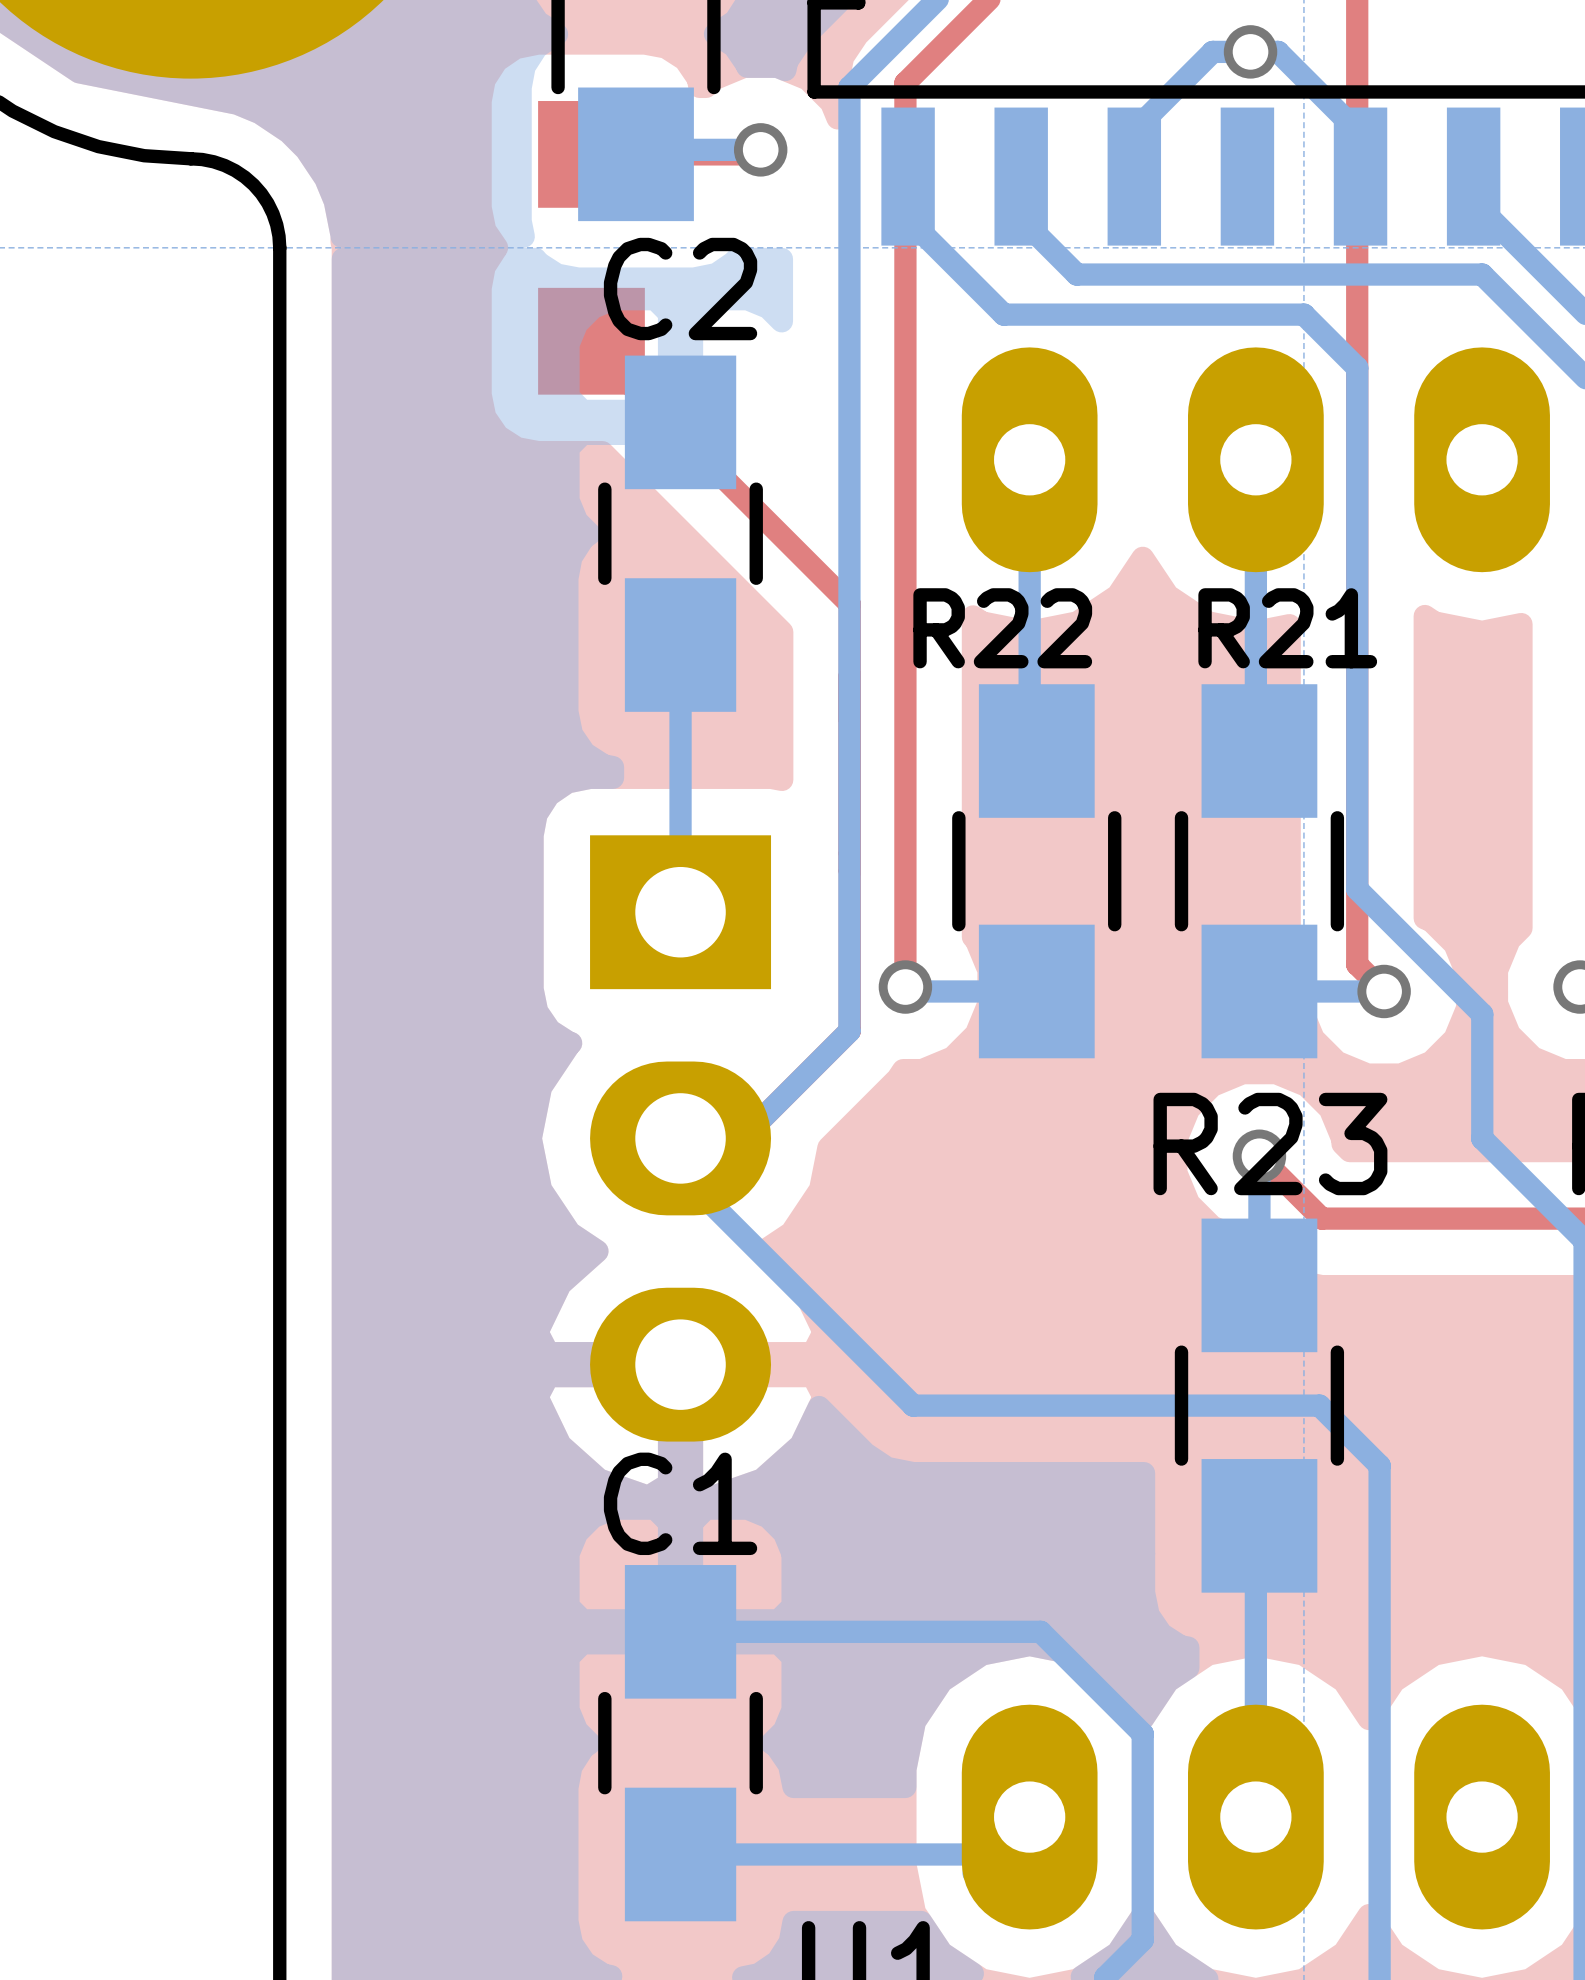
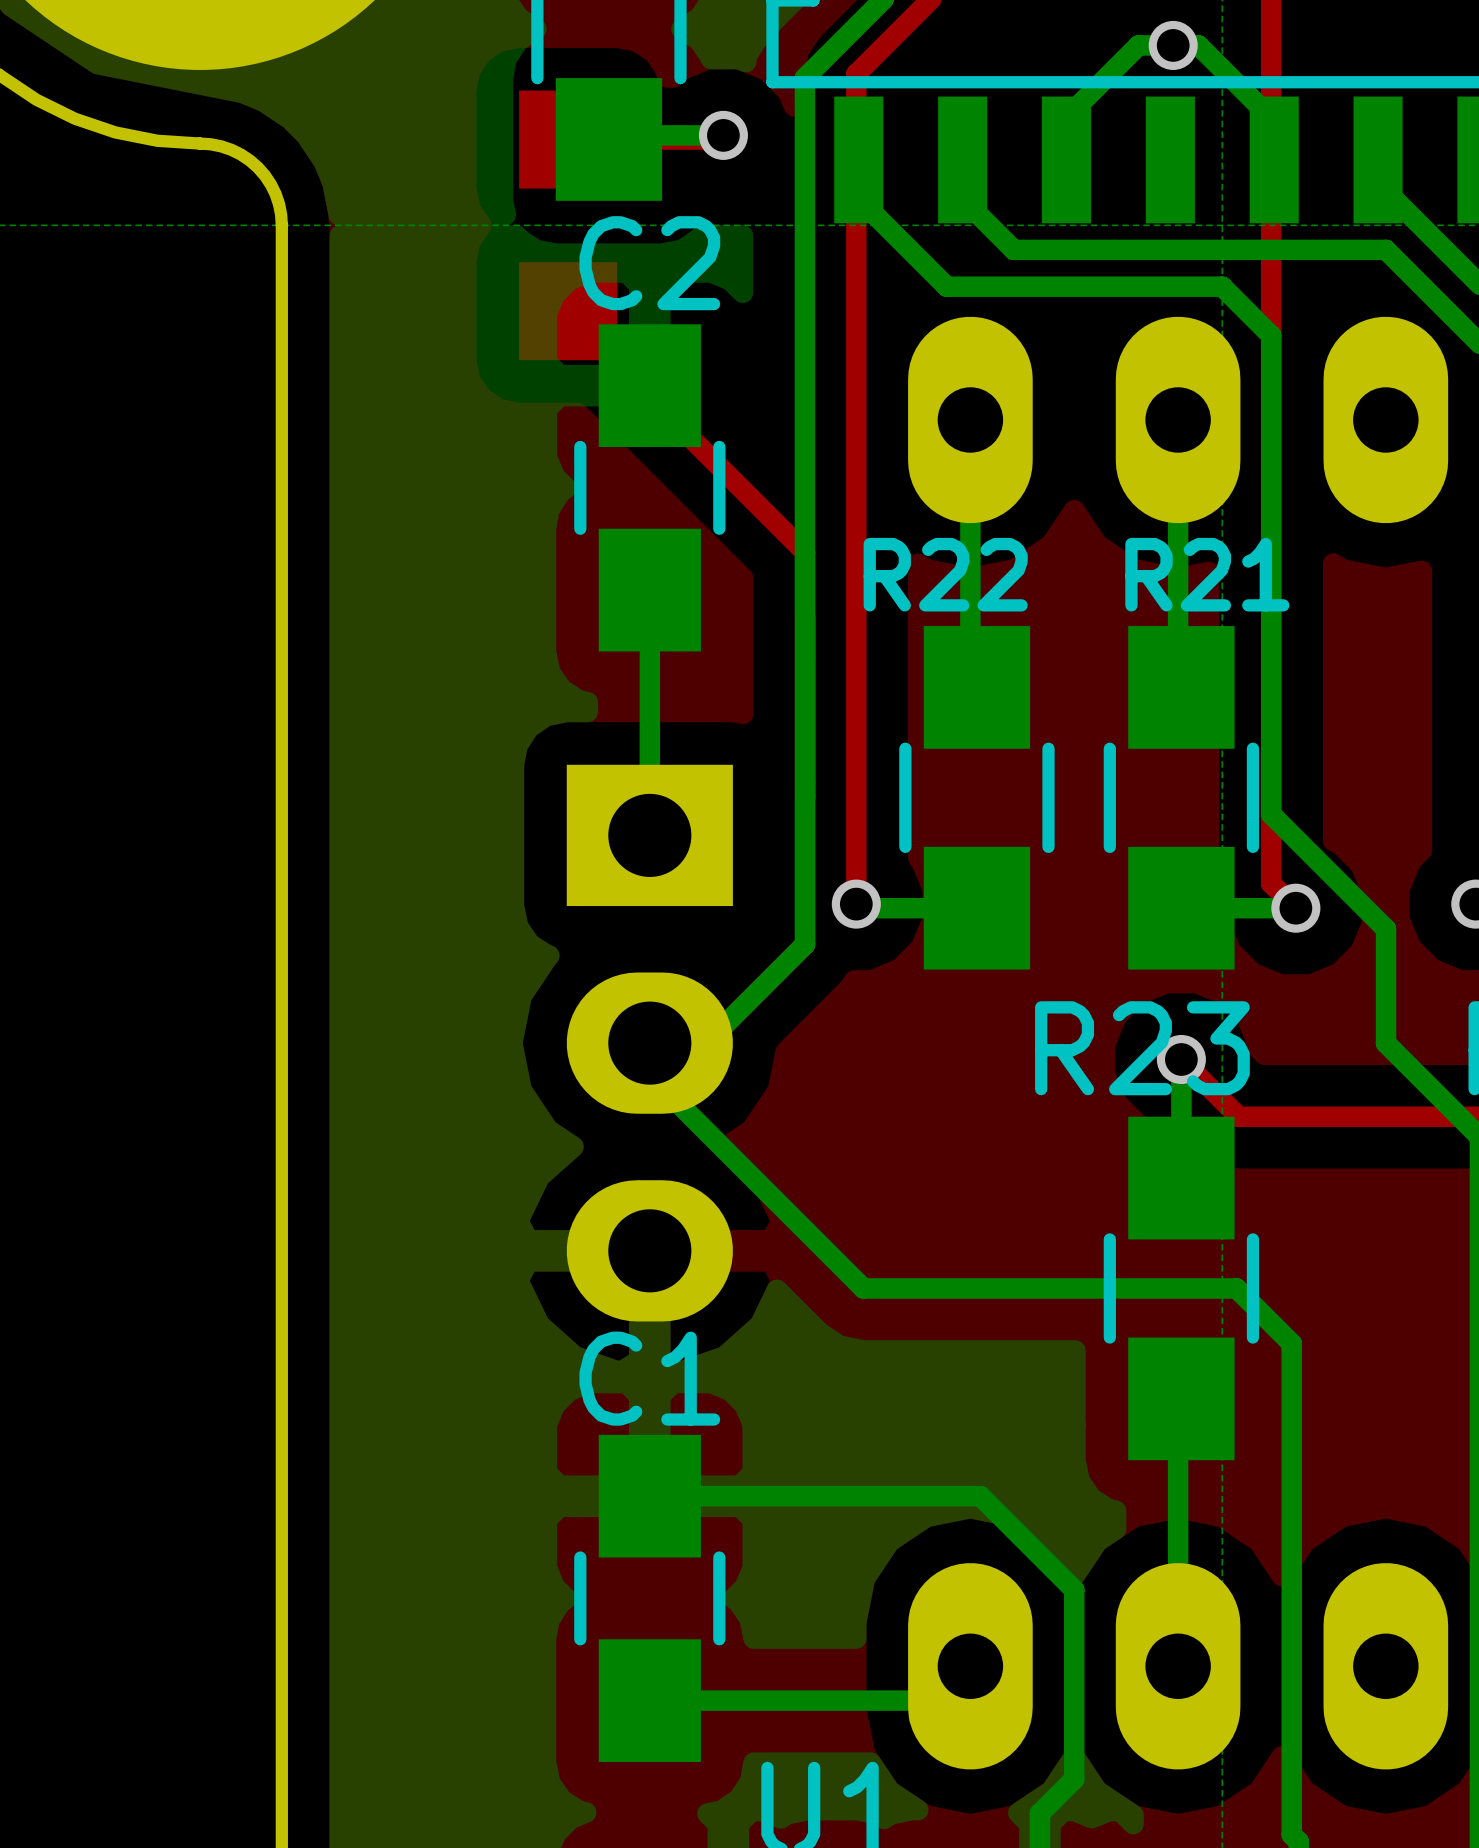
R23 name position: R23 (1270, 1144) -> R23 (1142, 1048)

